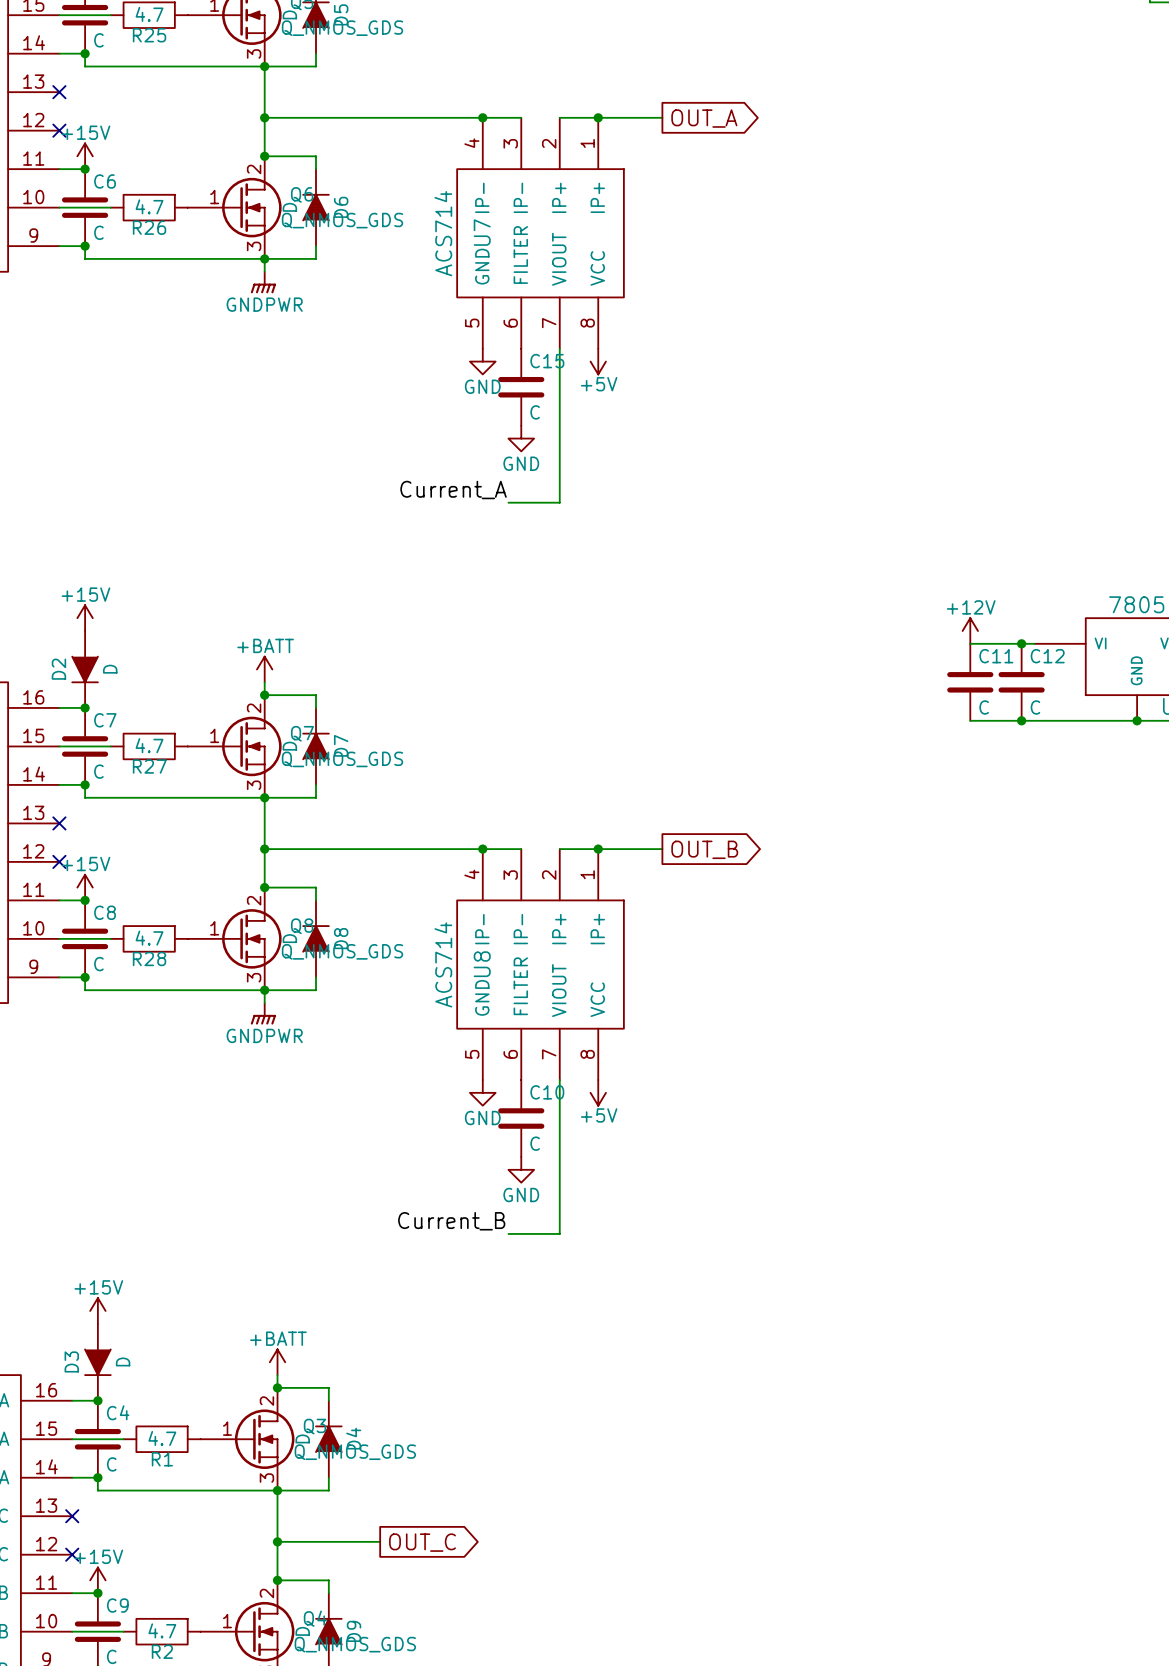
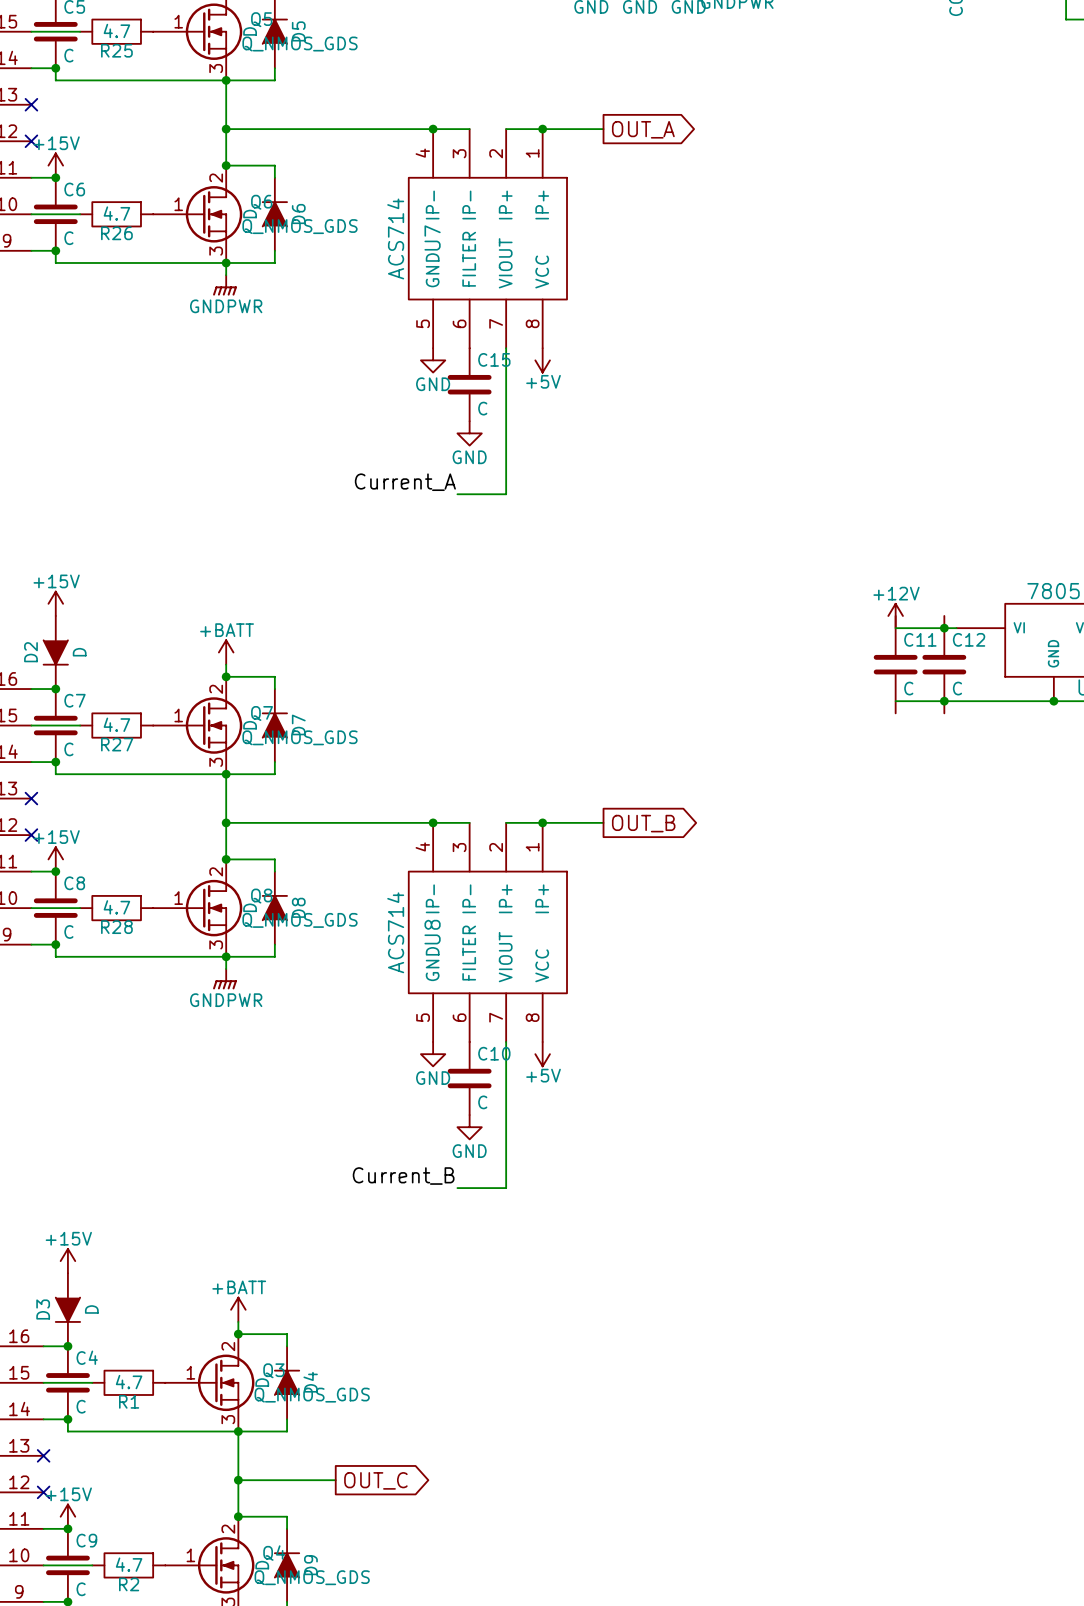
C11 symbol: [947, 643, 994, 721] -> [873, 615, 918, 714]
C12 symbol: [998, 643, 1045, 721] -> [922, 615, 967, 714]

